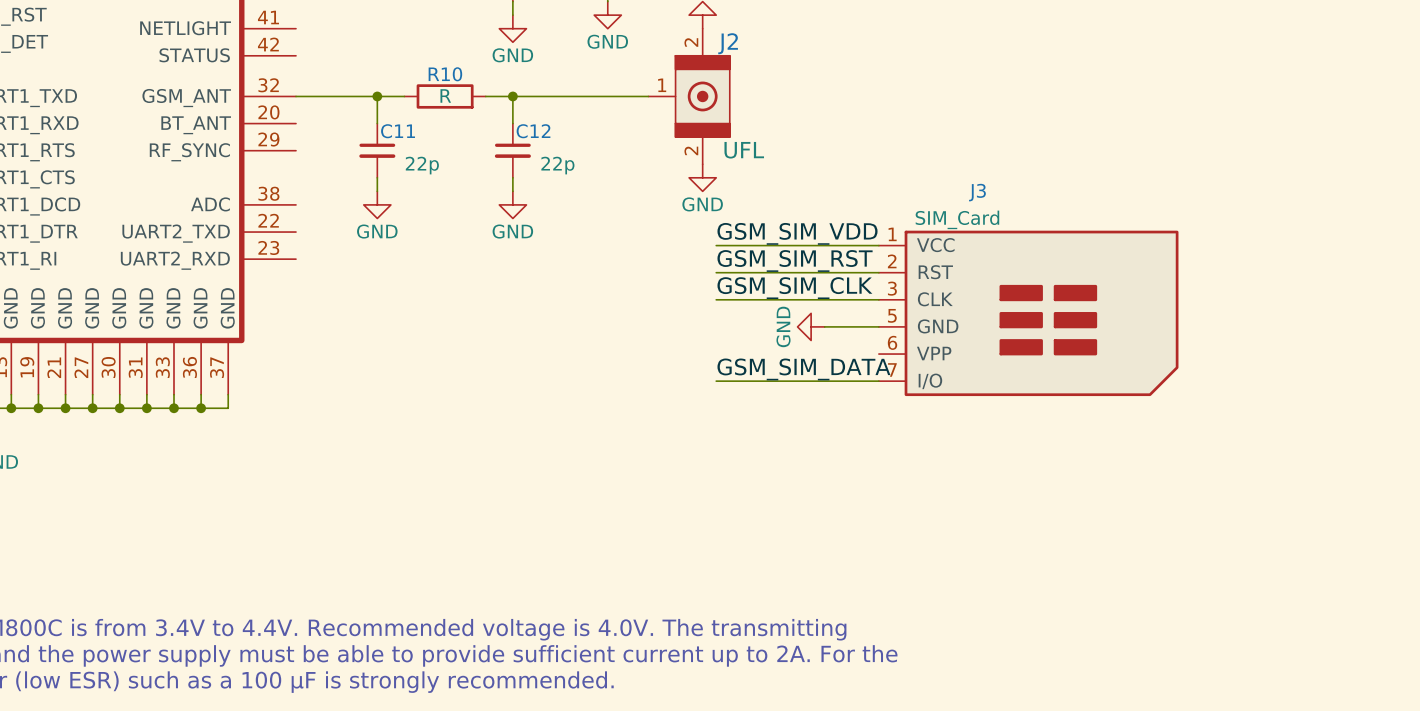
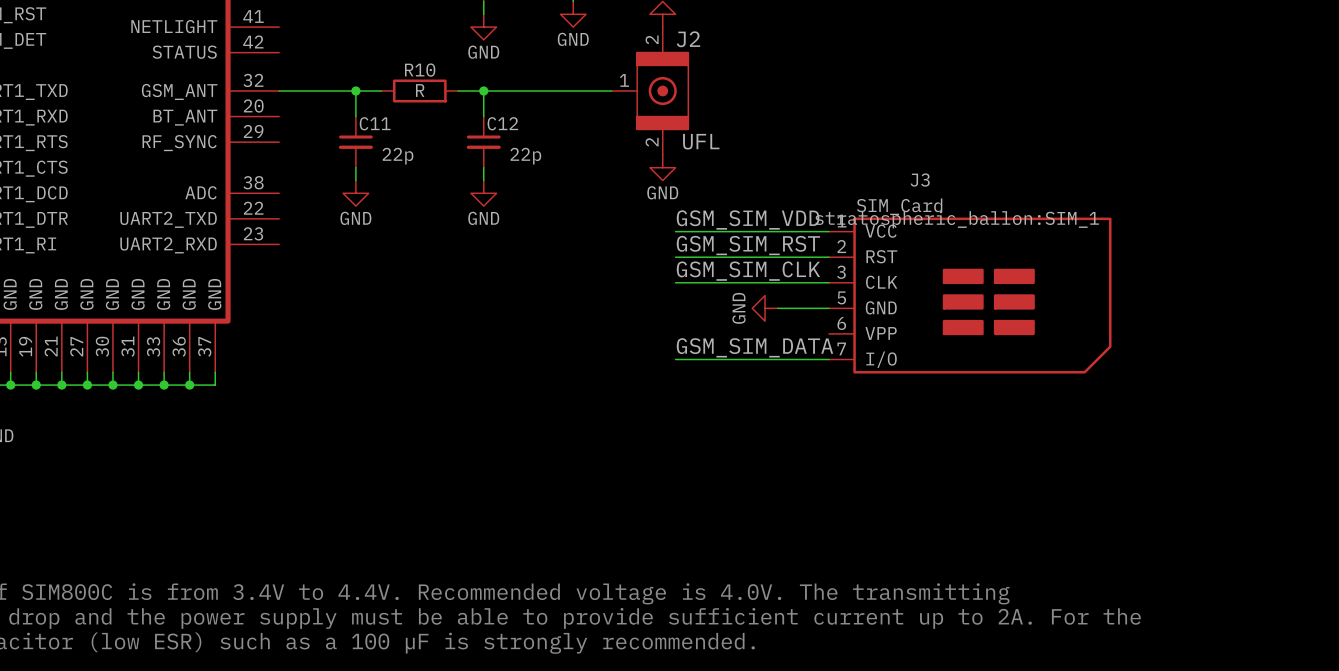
J3 text: none -> stratospheric_ballon:SIM_1 (957, 219)

